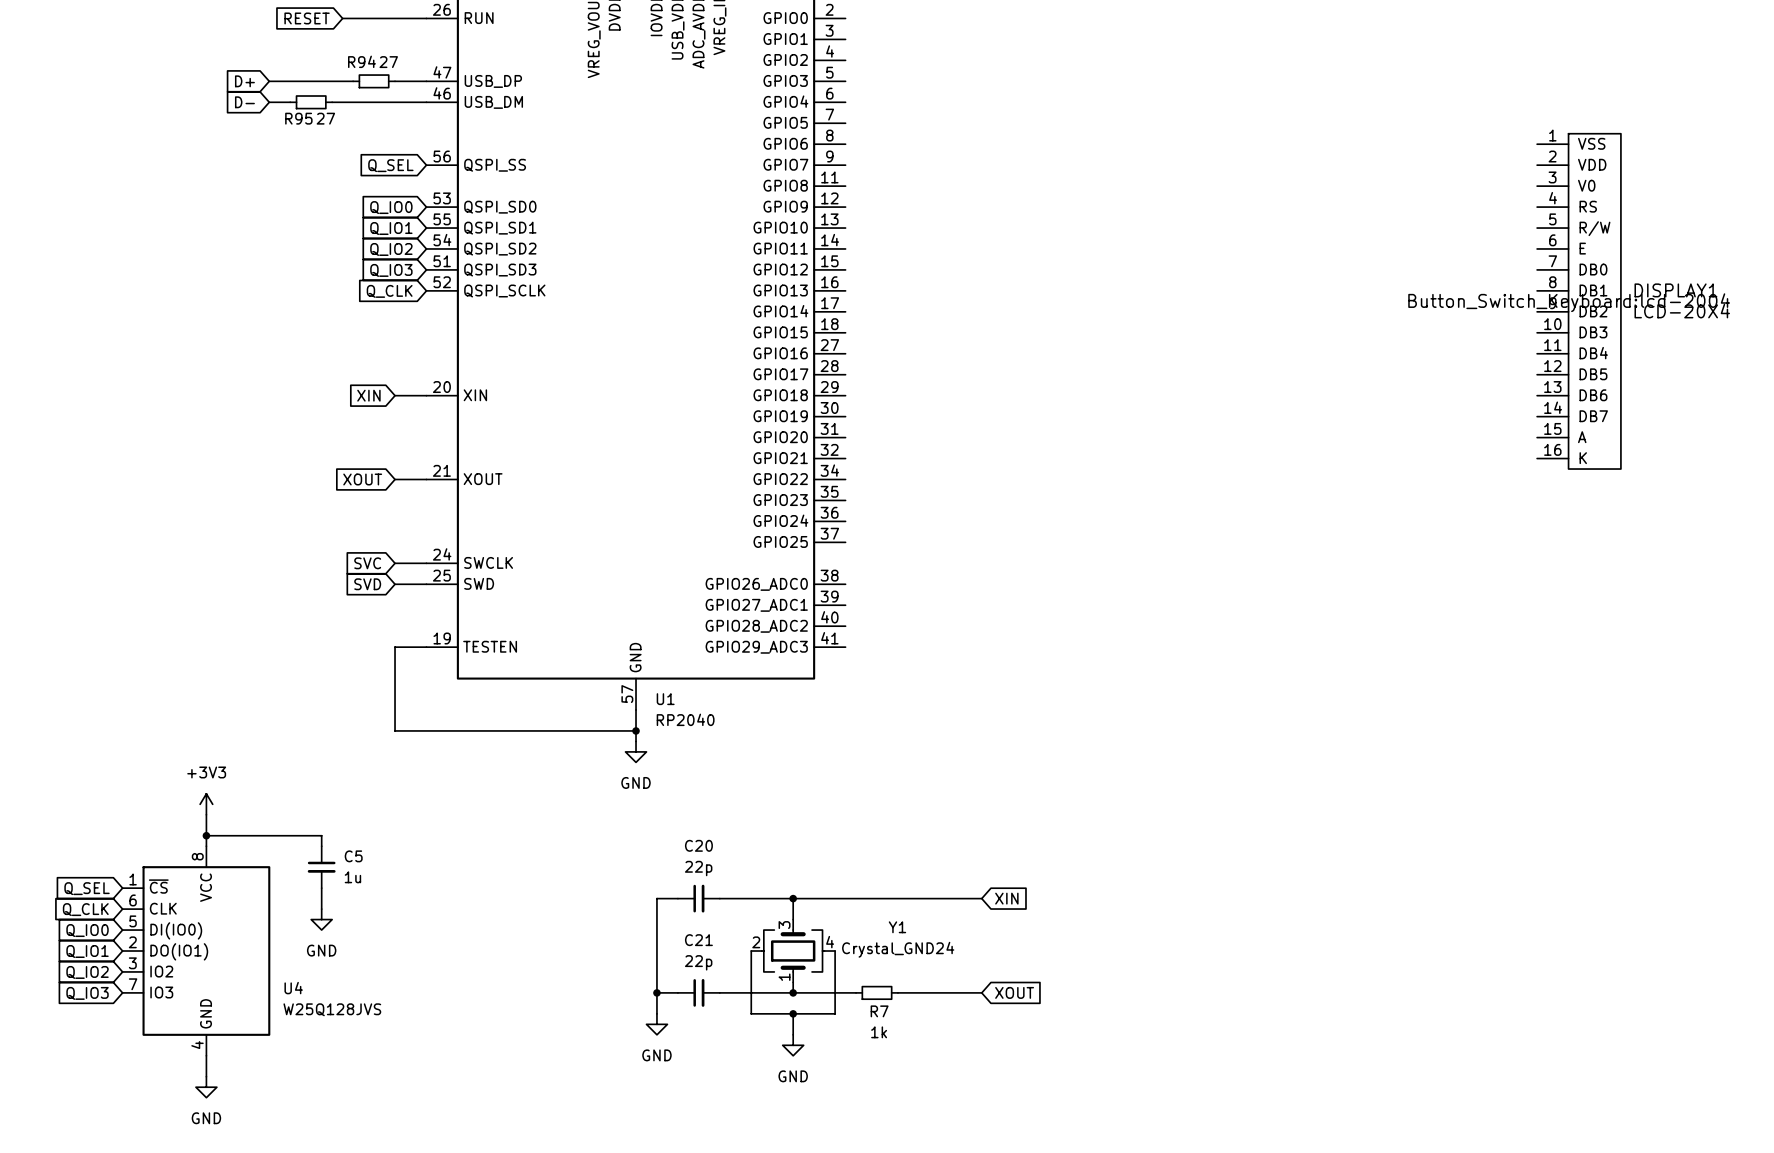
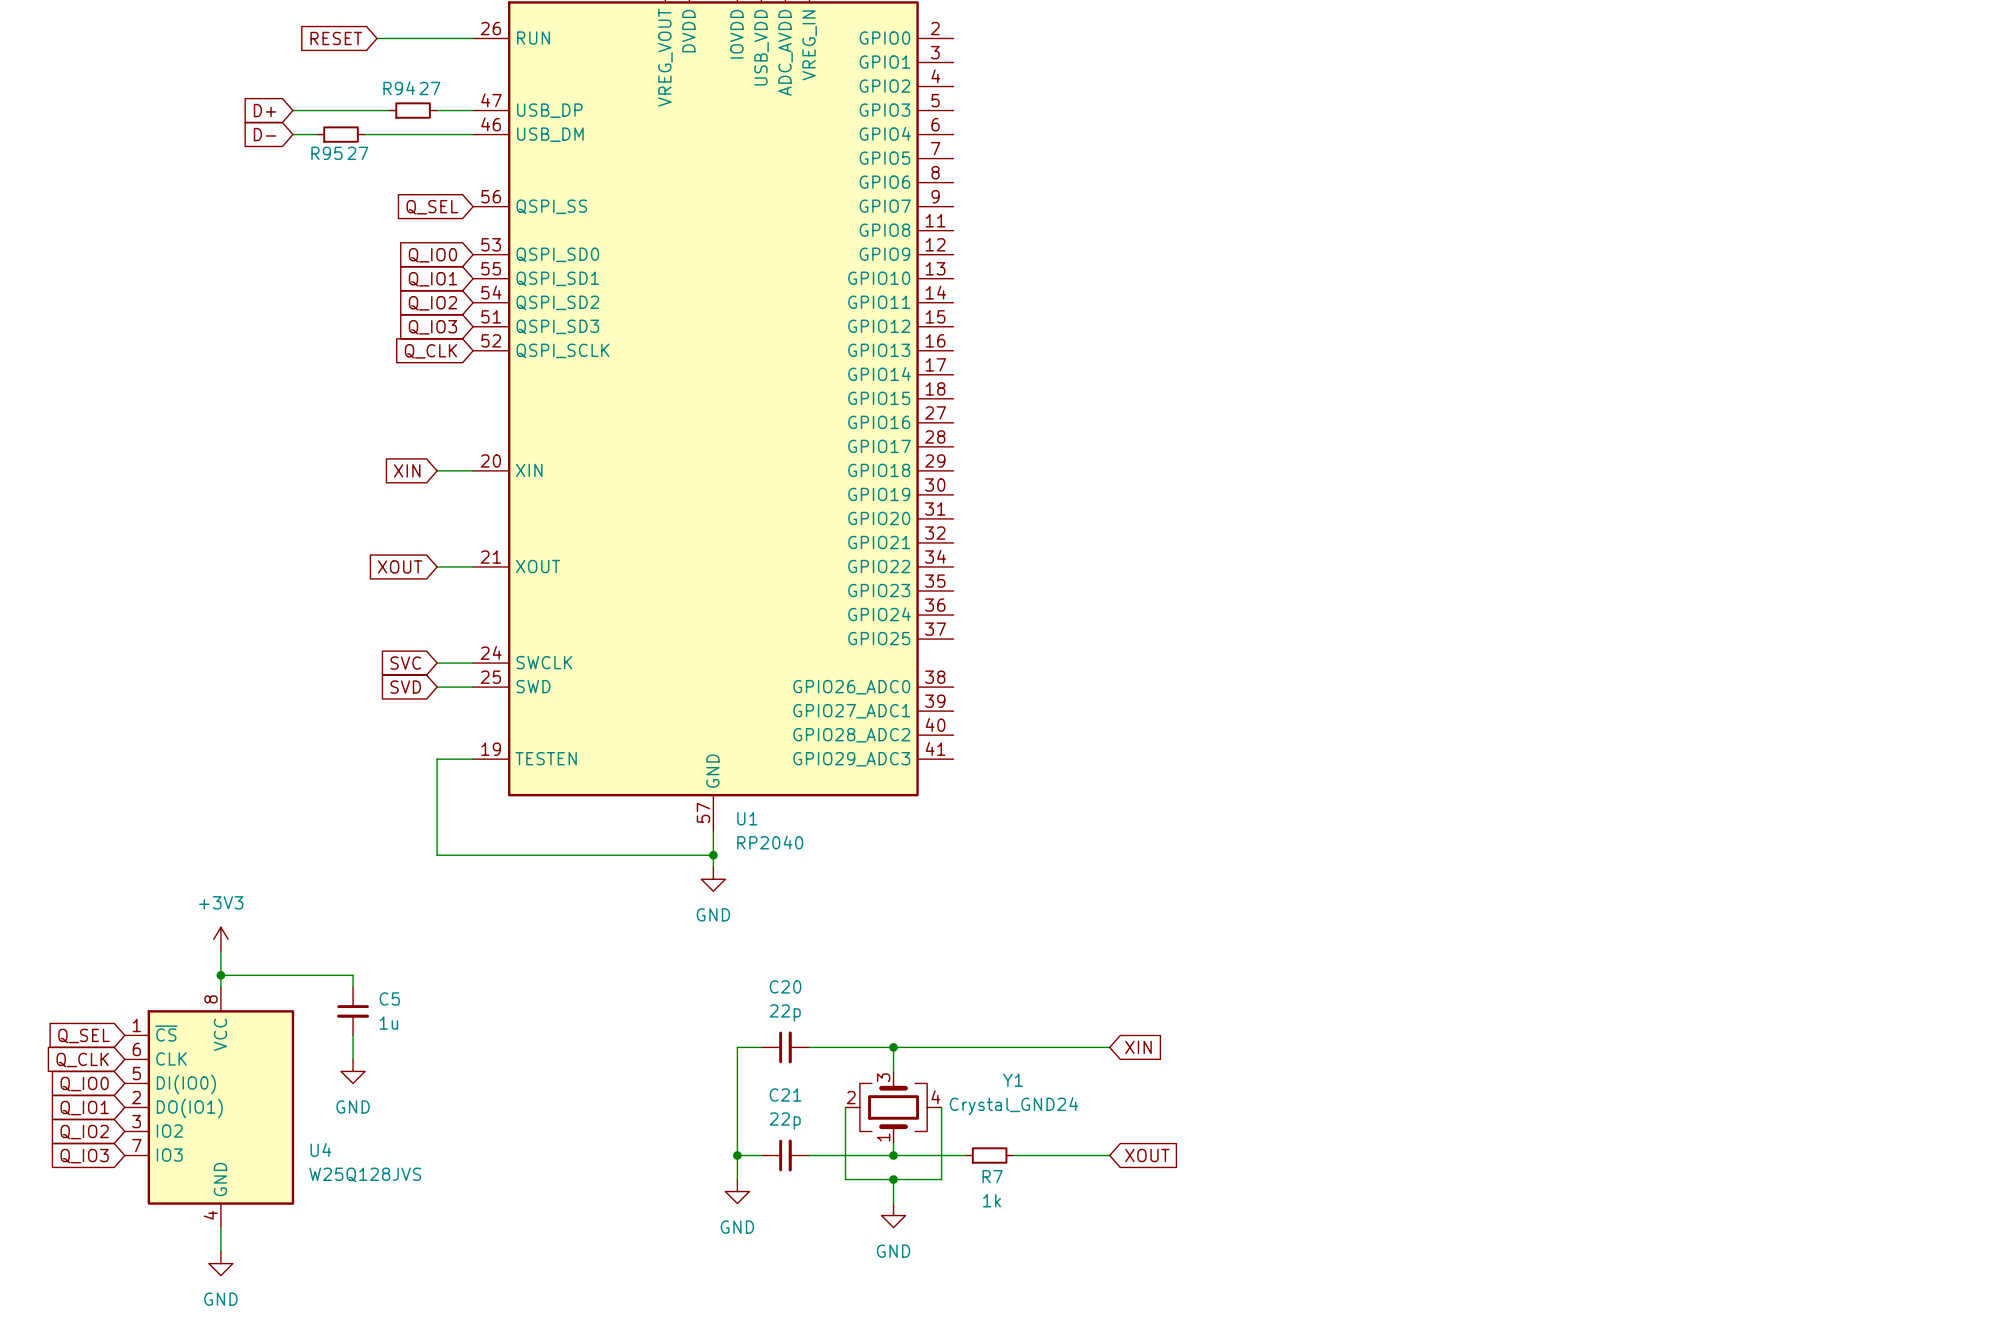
DISPLAY1: LCD-20X4 (1579, 301) -> none

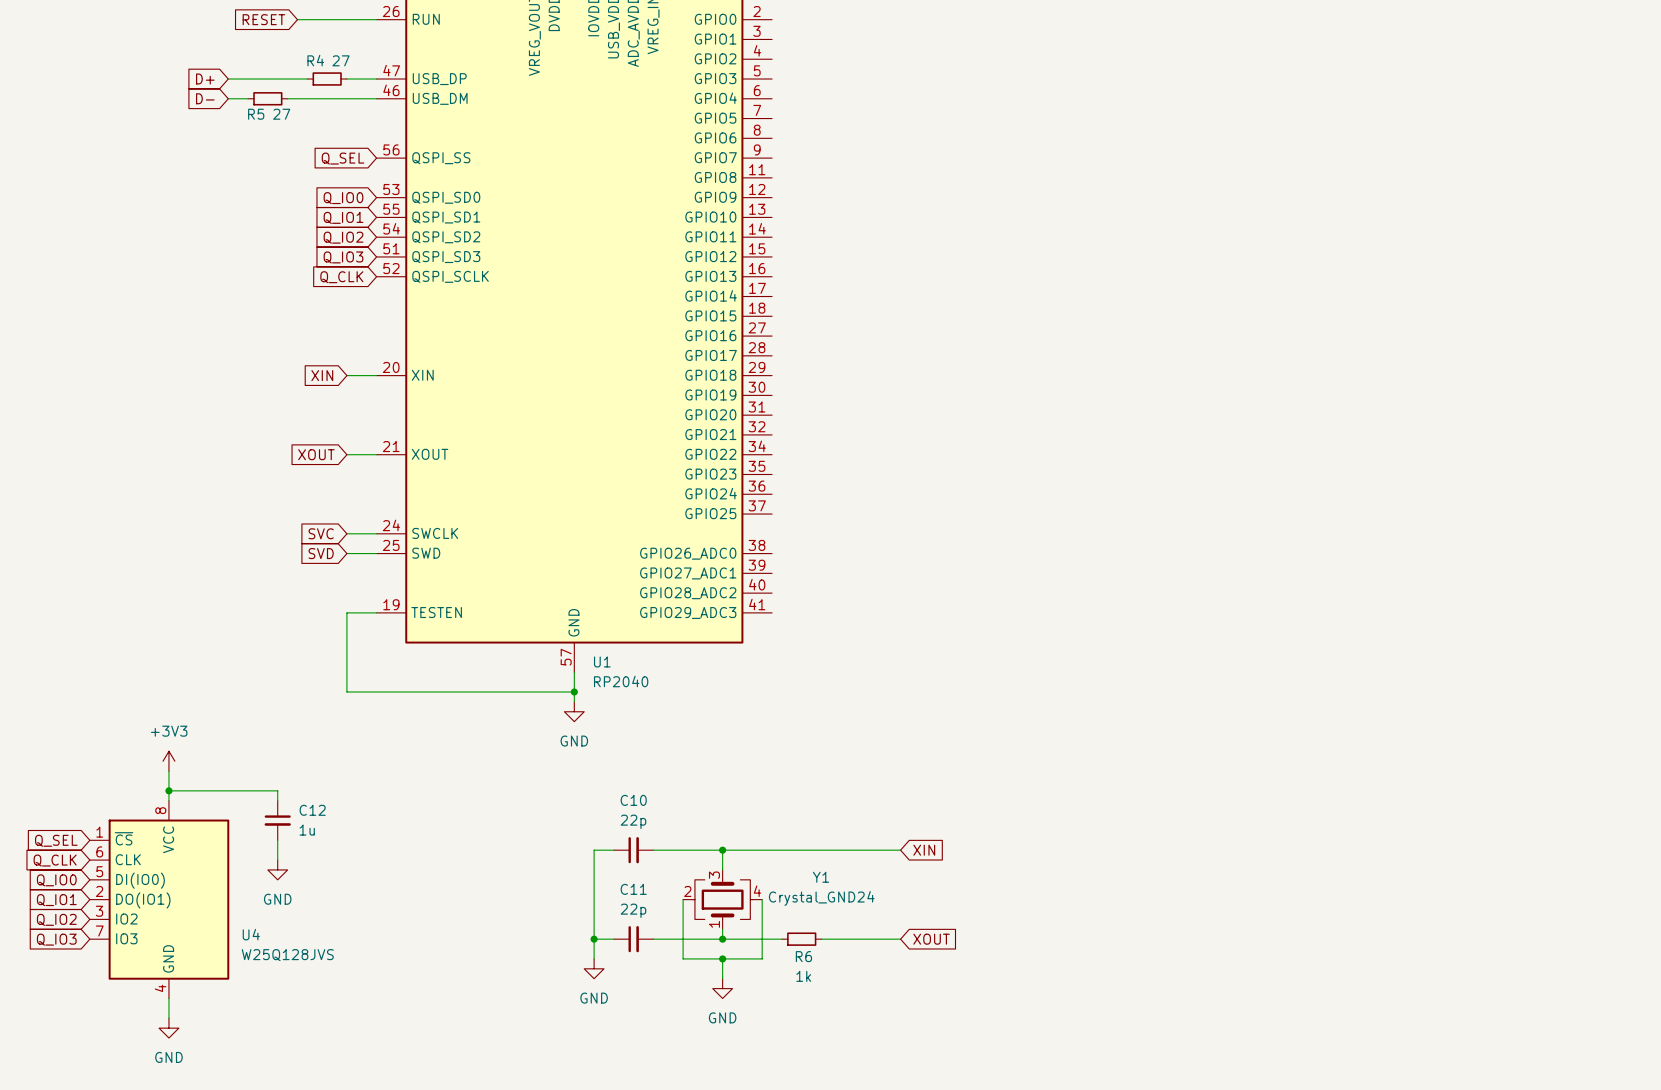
R94 name: R94 (399, 88) -> R4 (315, 60)
R95 name: R95 (326, 153) -> R5 (256, 114)
C20 name: C20 (785, 986) -> C10 (633, 800)
C5 name: C5 (389, 998) -> C12 (312, 810)
C21 name: C21 (785, 1095) -> C11 (633, 889)
R7 name: R7 (992, 1176) -> R6 (803, 956)

